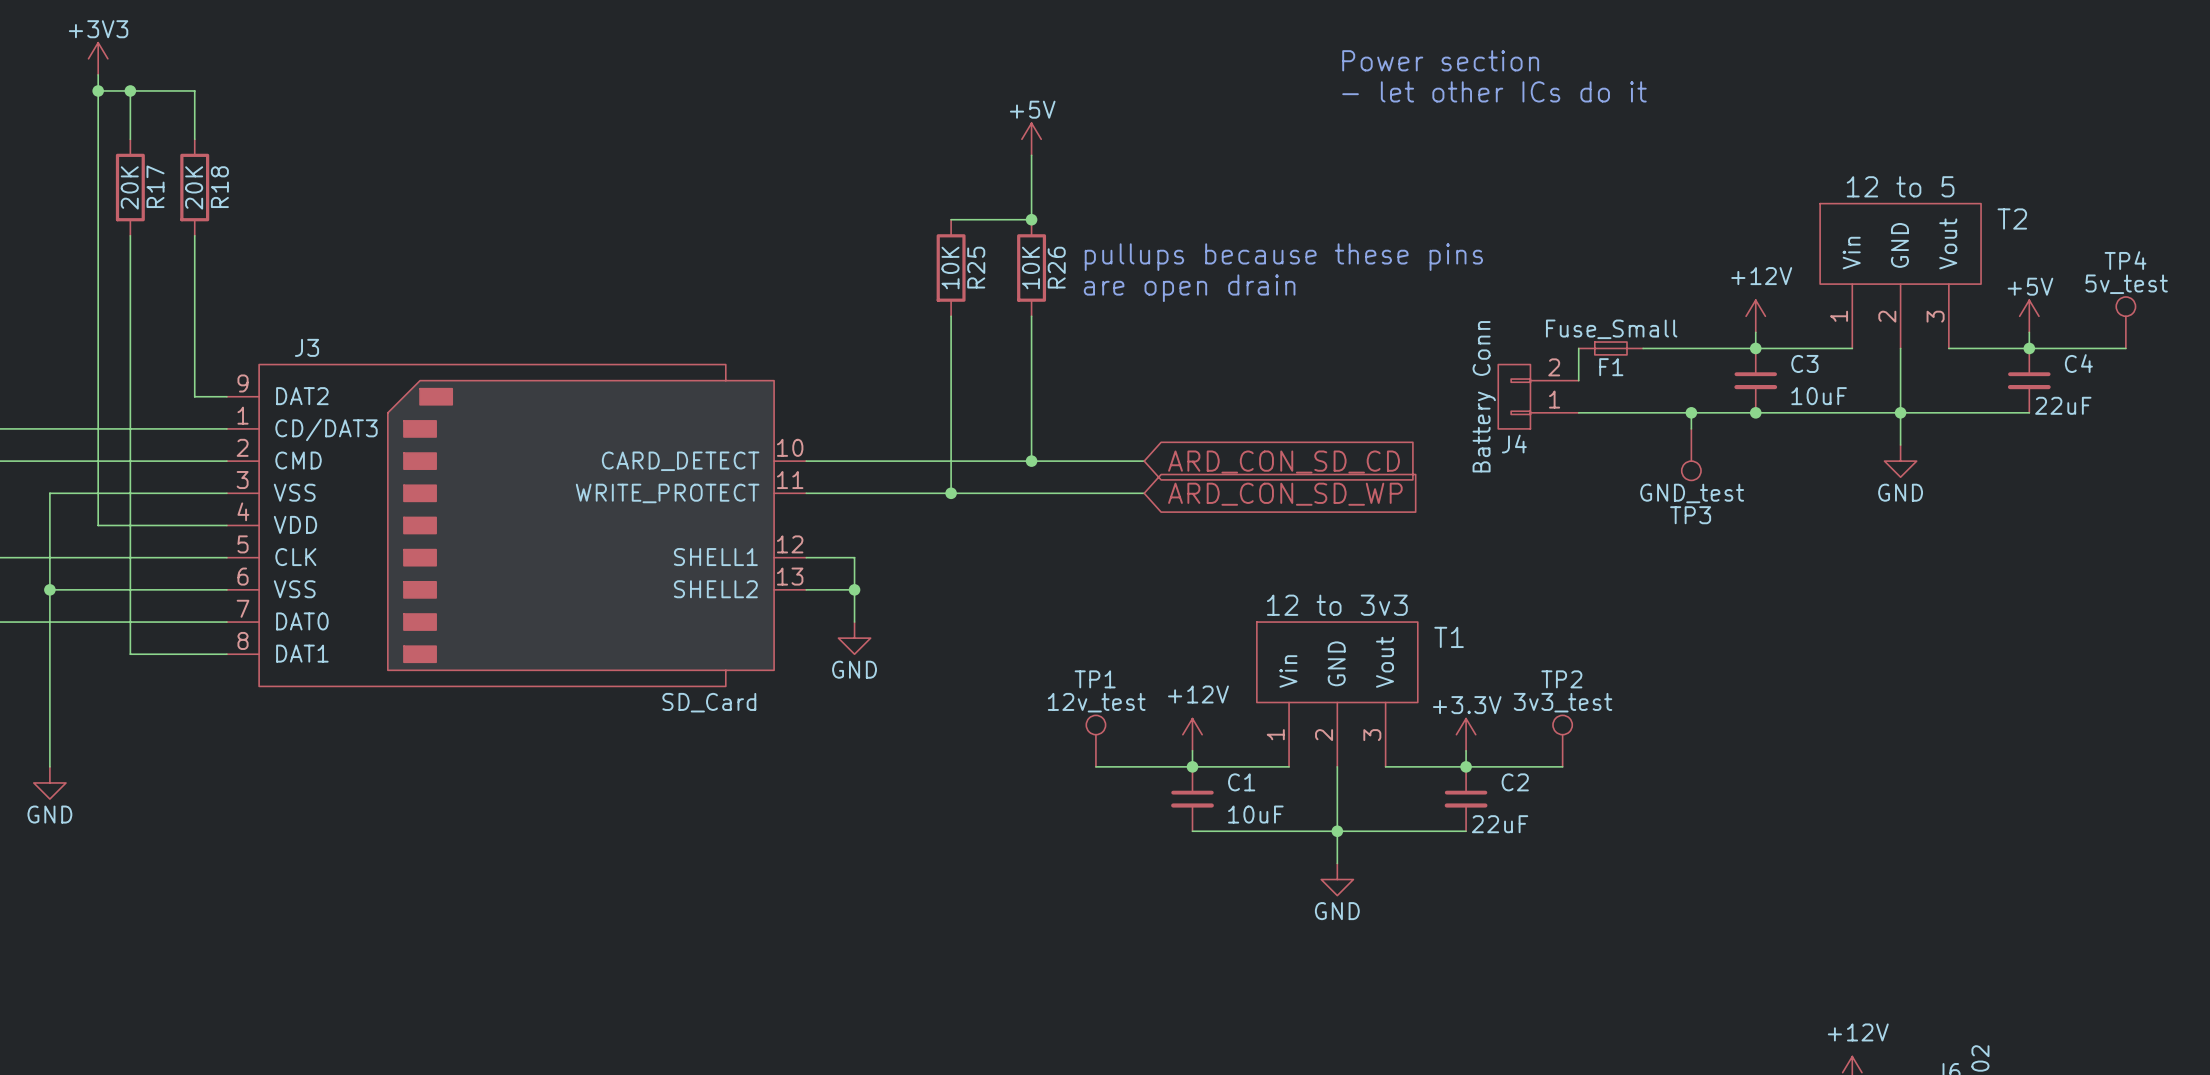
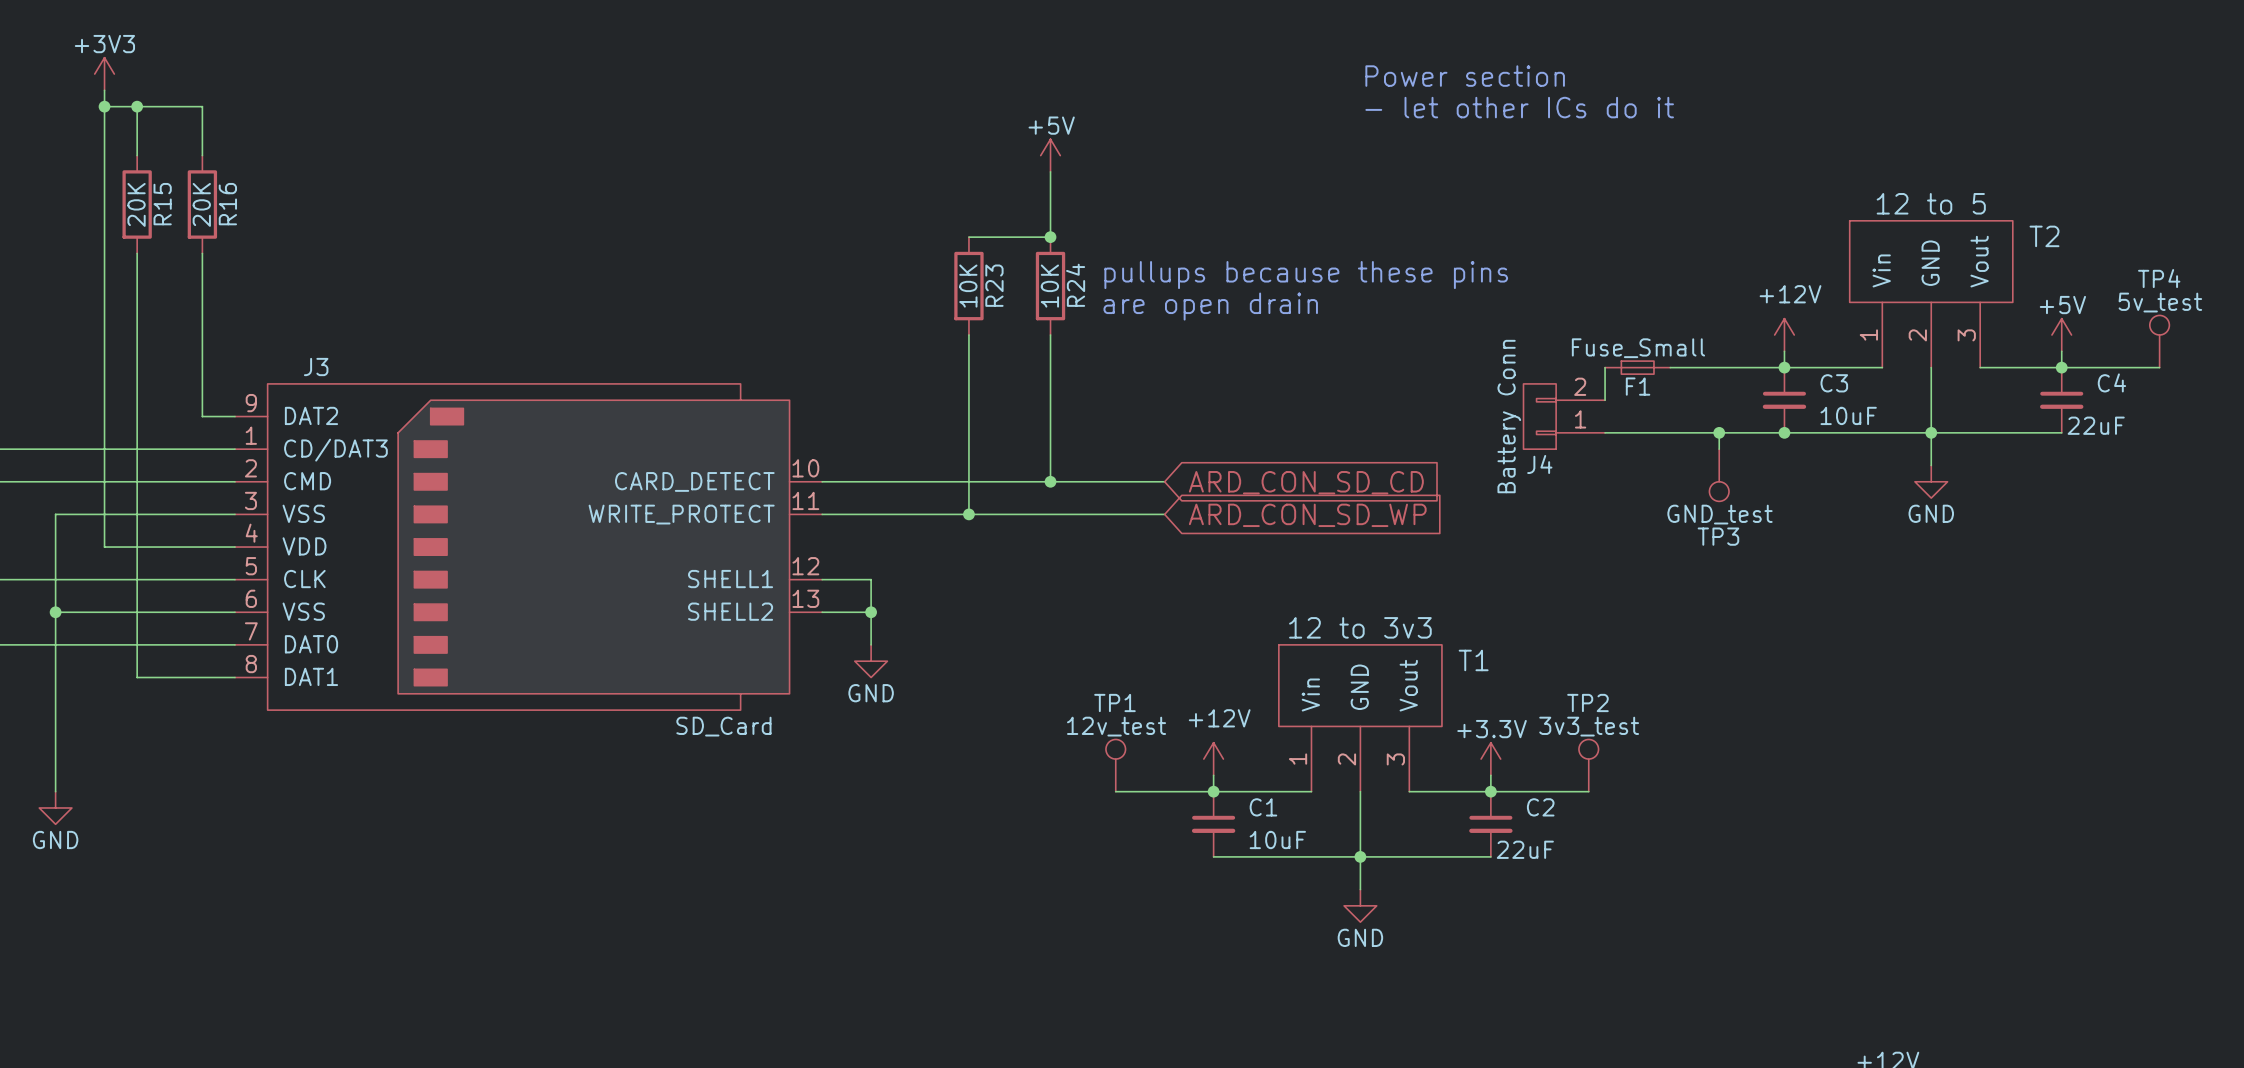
R17 name: R17 (155, 186) -> R15 (162, 204)
R18 name: R18 (219, 187) -> R16 (227, 204)
R25 name: R25 (976, 267) -> R23 (994, 285)
R26 name: R26 (1056, 267) -> R24 (1075, 285)

